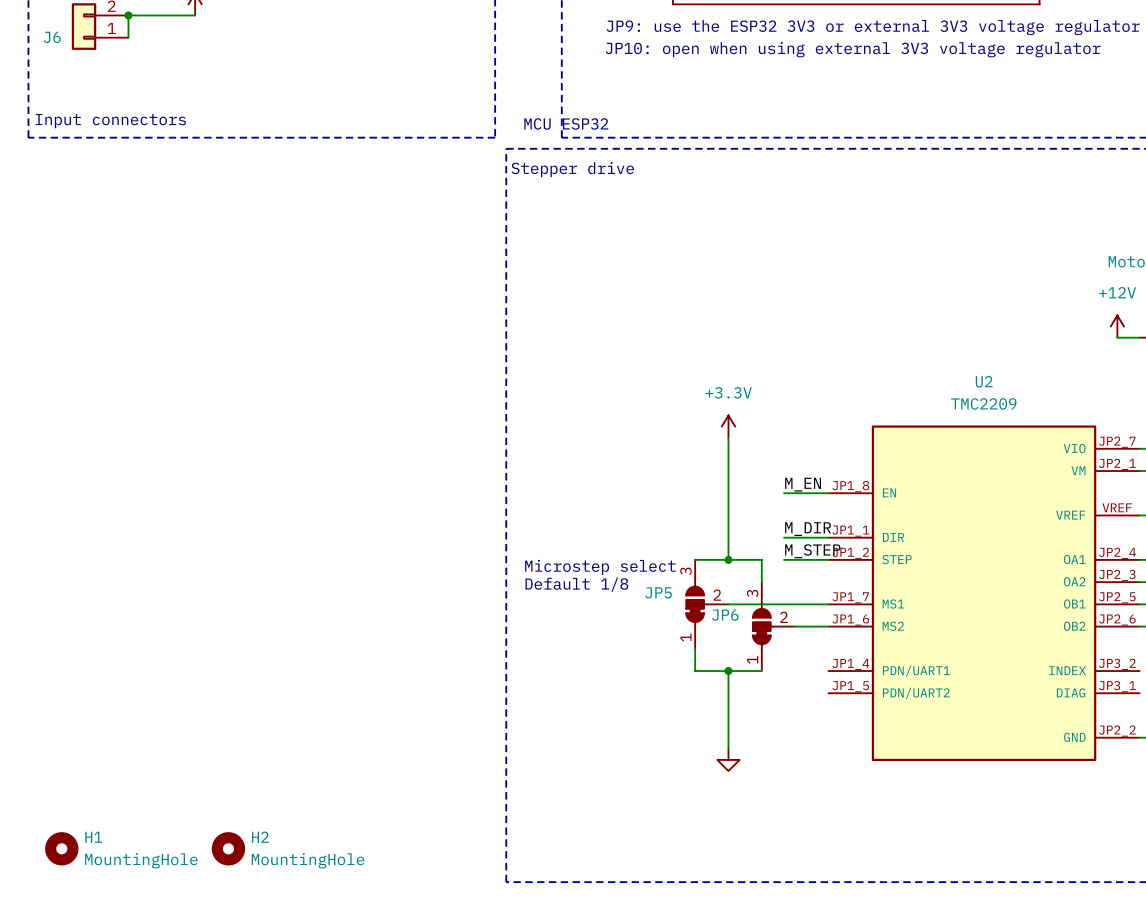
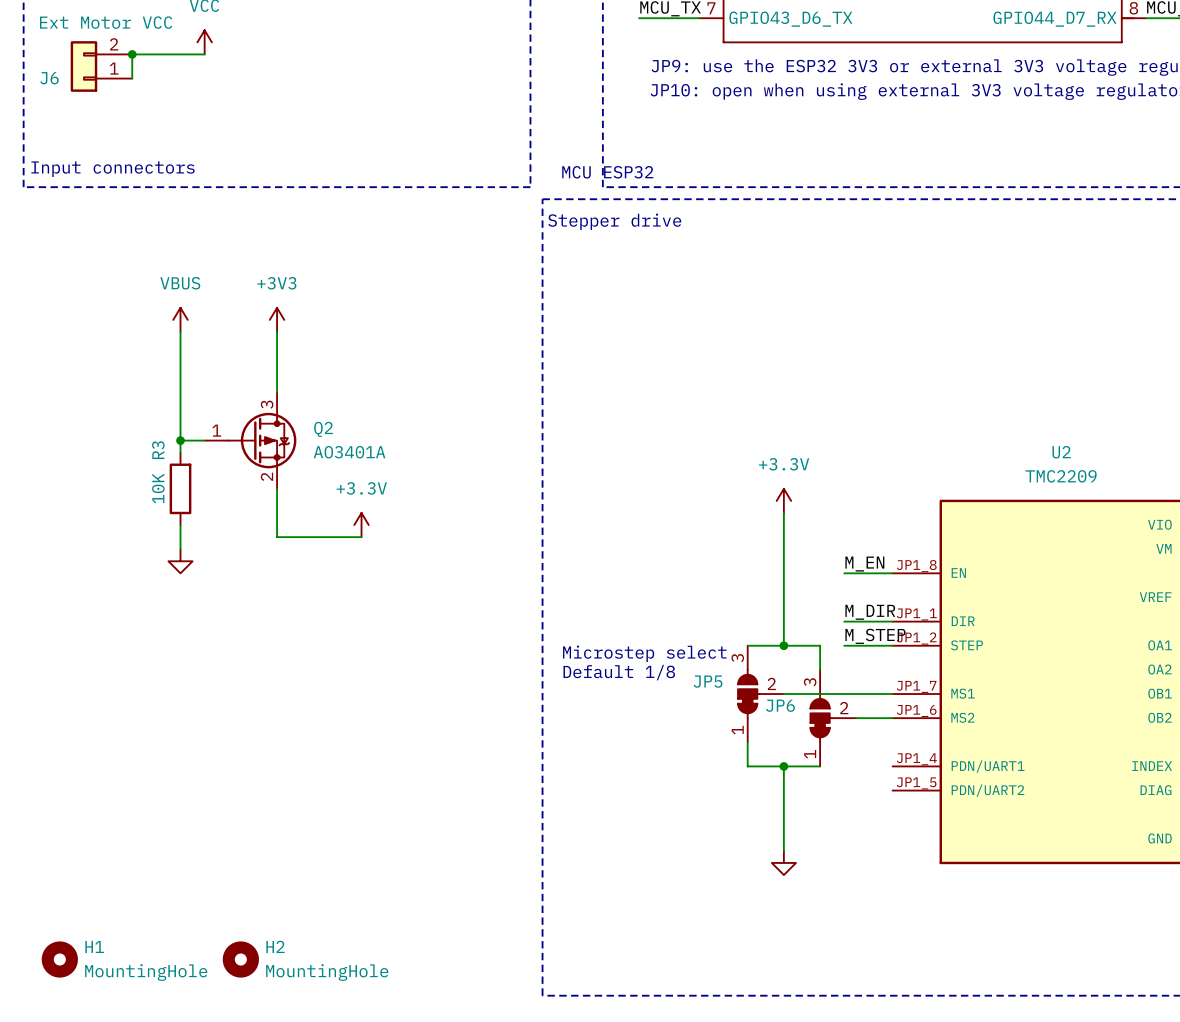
power symbol: none -> VBUS (180, 319)
power symbol: none -> +3V3 (277, 319)
wire: none -> (180, 331) (180, 452)
wire: none -> (277, 331) (277, 392)
wire: none -> (180, 440) (204, 440)
junction: none -> (180, 440)
Q2: none -> AO3401A (250, 440)
R3: none -> 10K (180, 488)
wire: none -> (277, 488) (277, 537) (361, 537)
wire: none -> (180, 525) (180, 549)
power symbol: none -> +3.3V (361, 525)
power symbol: none -> (180, 561)

